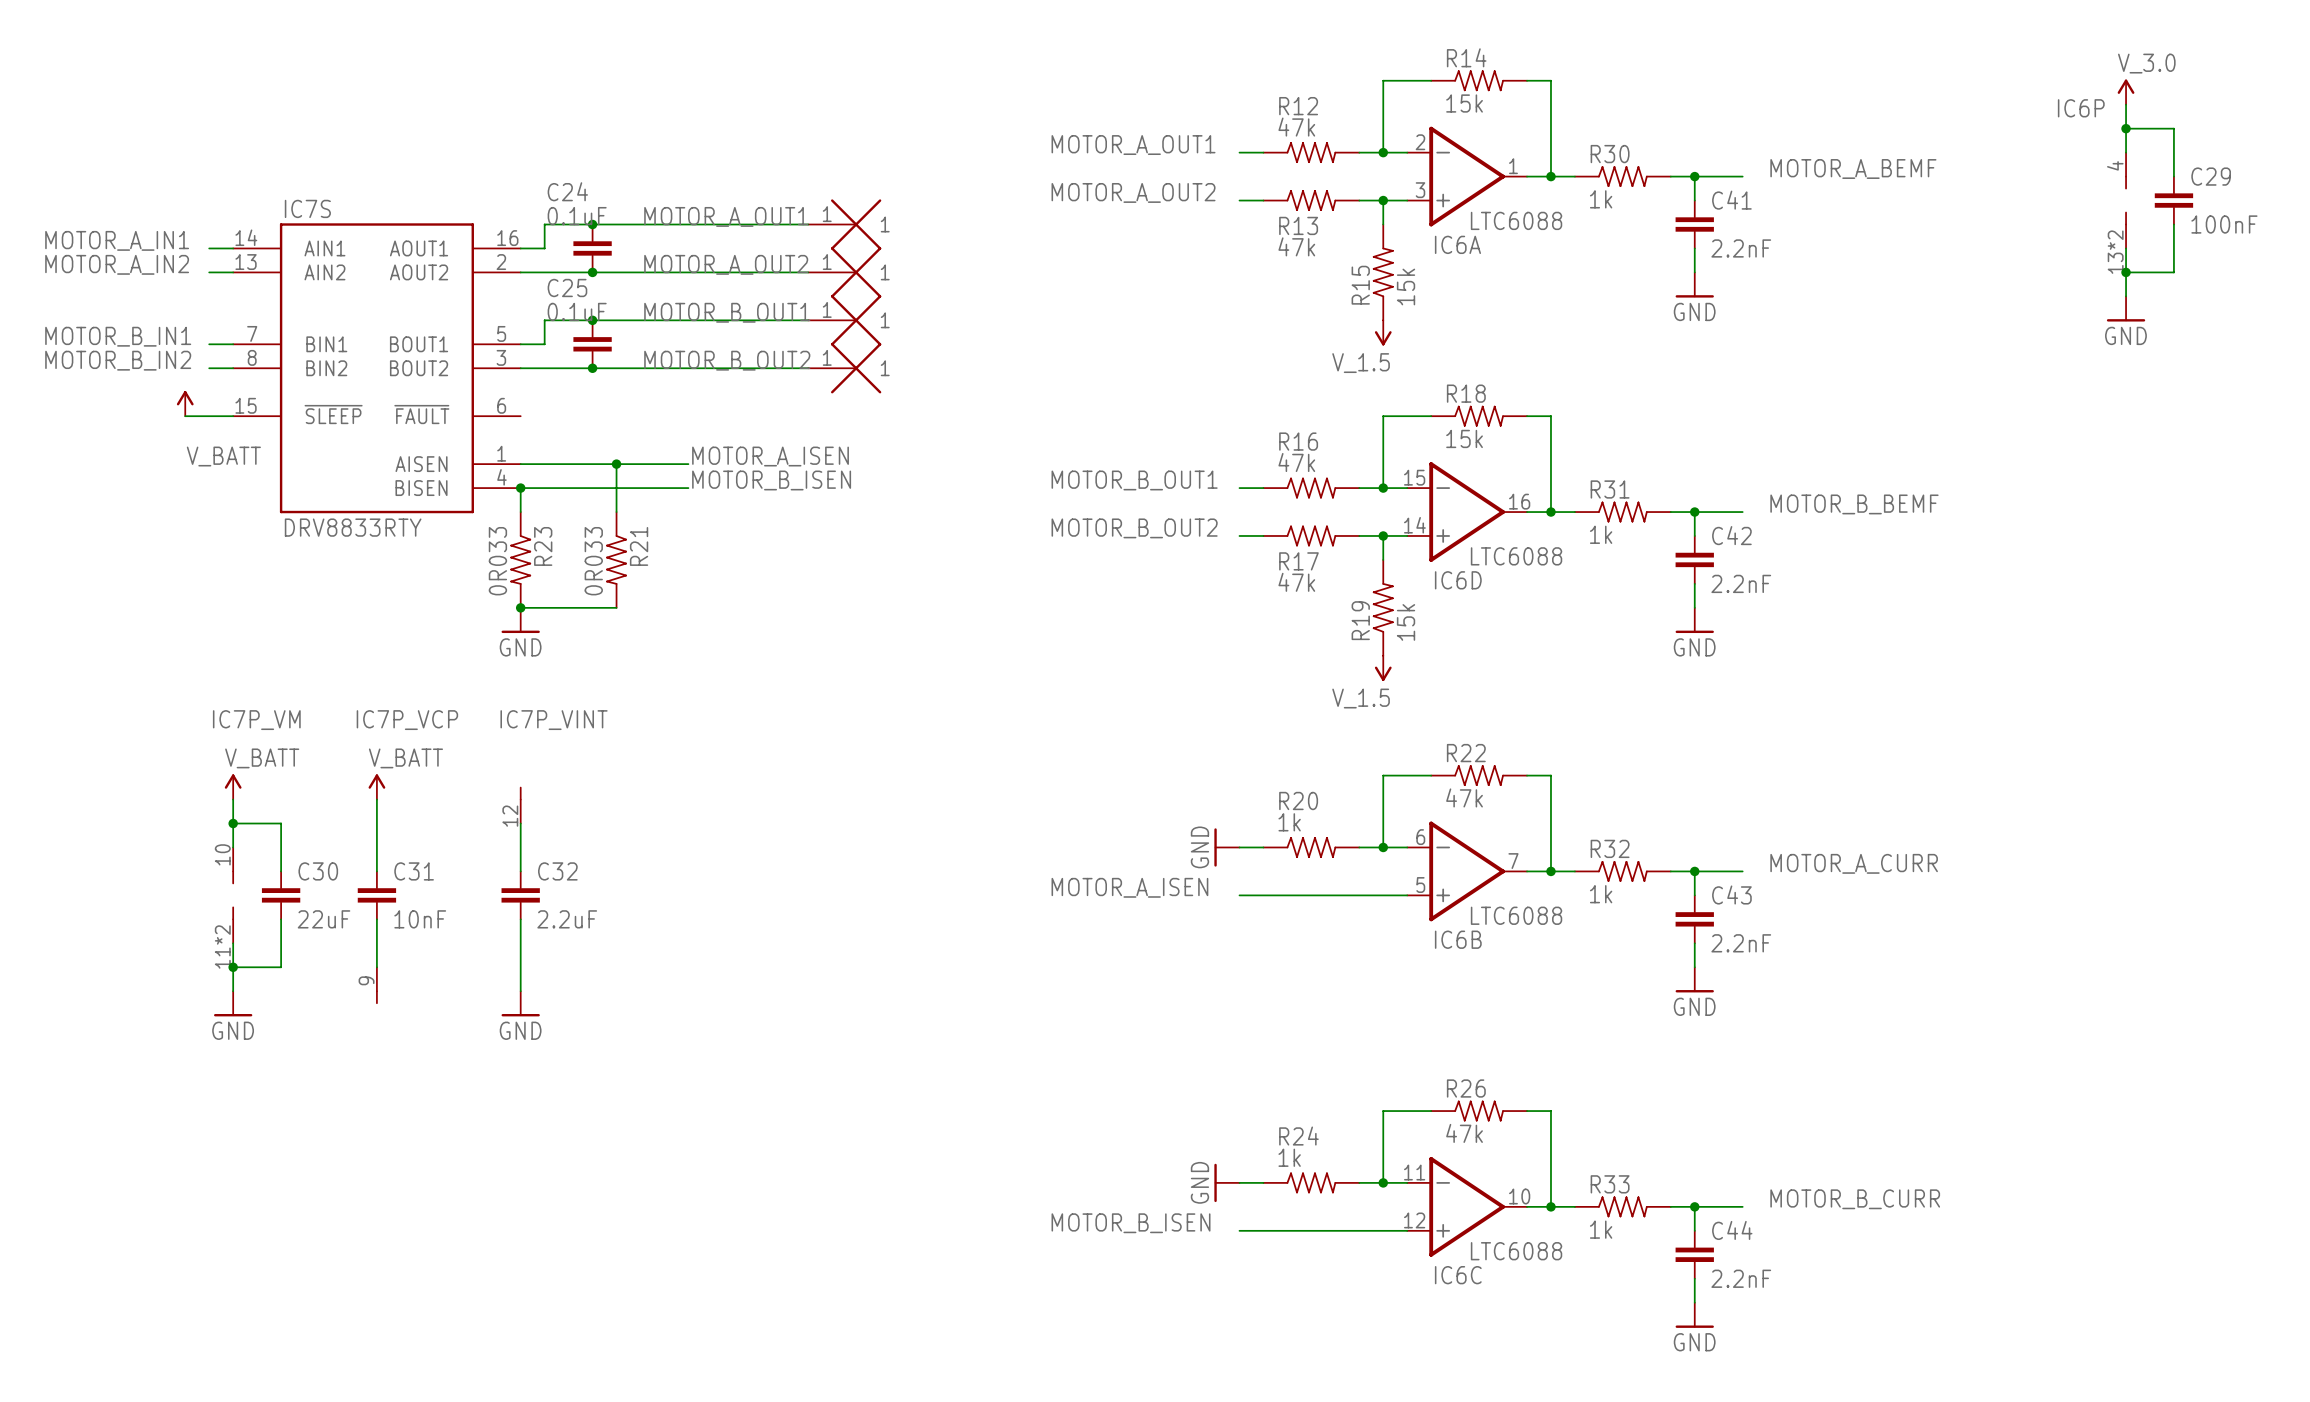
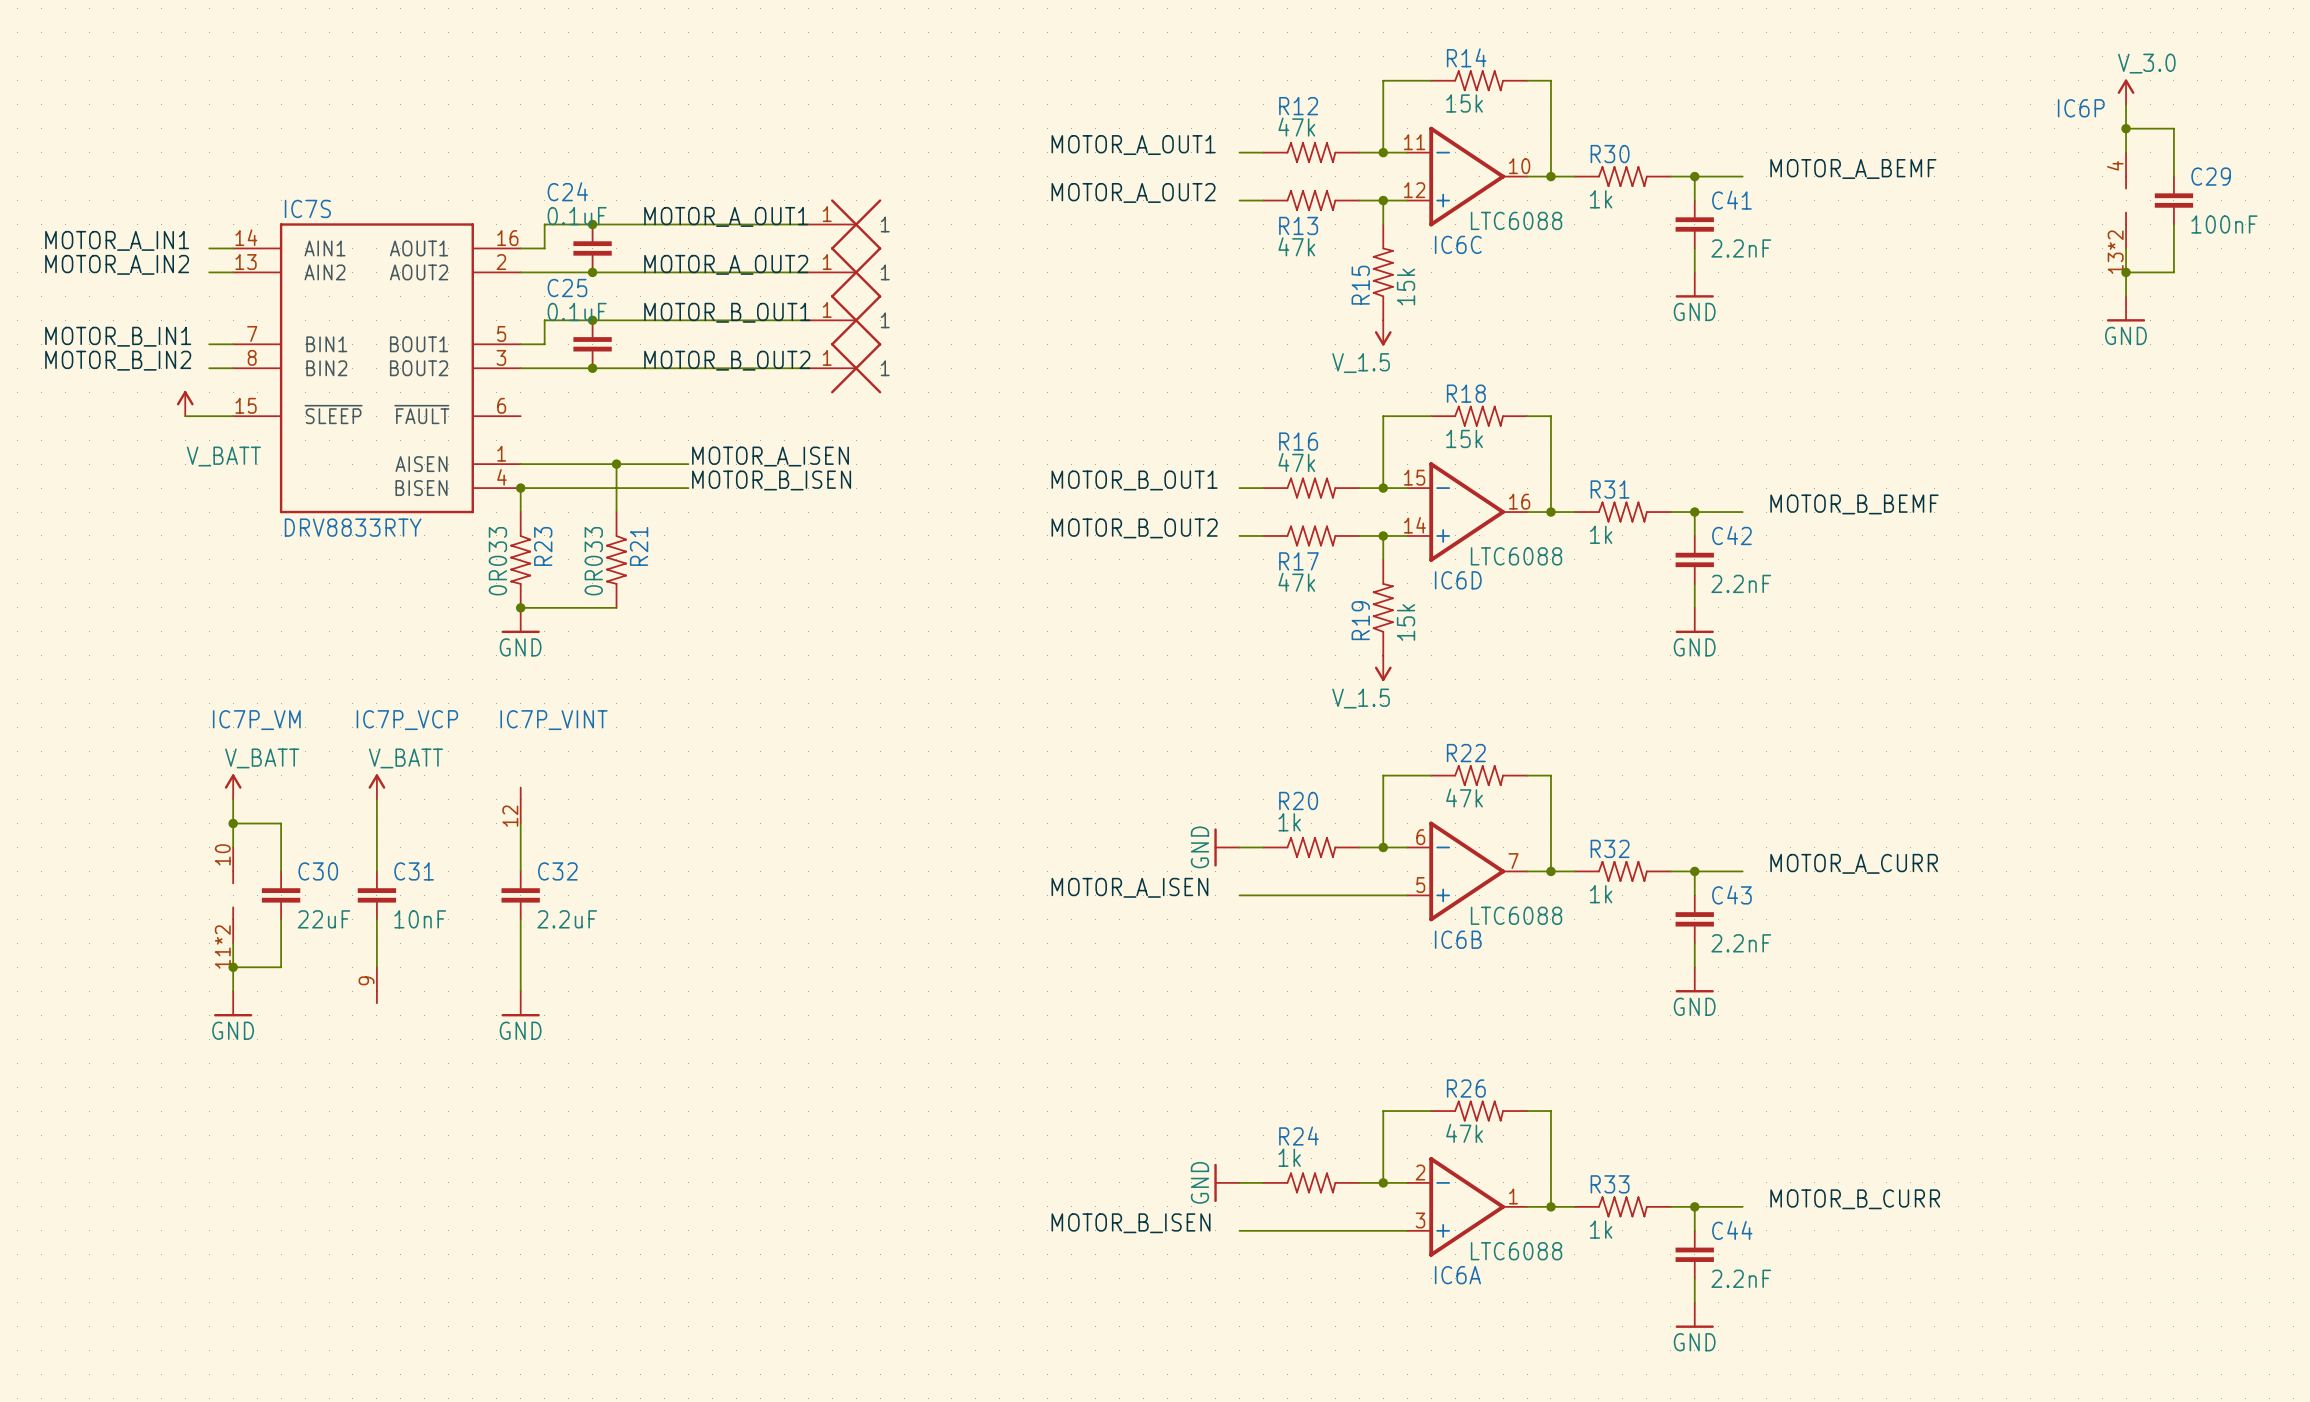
IC6A position: (1467, 176) -> (1467, 1206)
IC6C position: (1467, 1206) -> (1467, 176)

